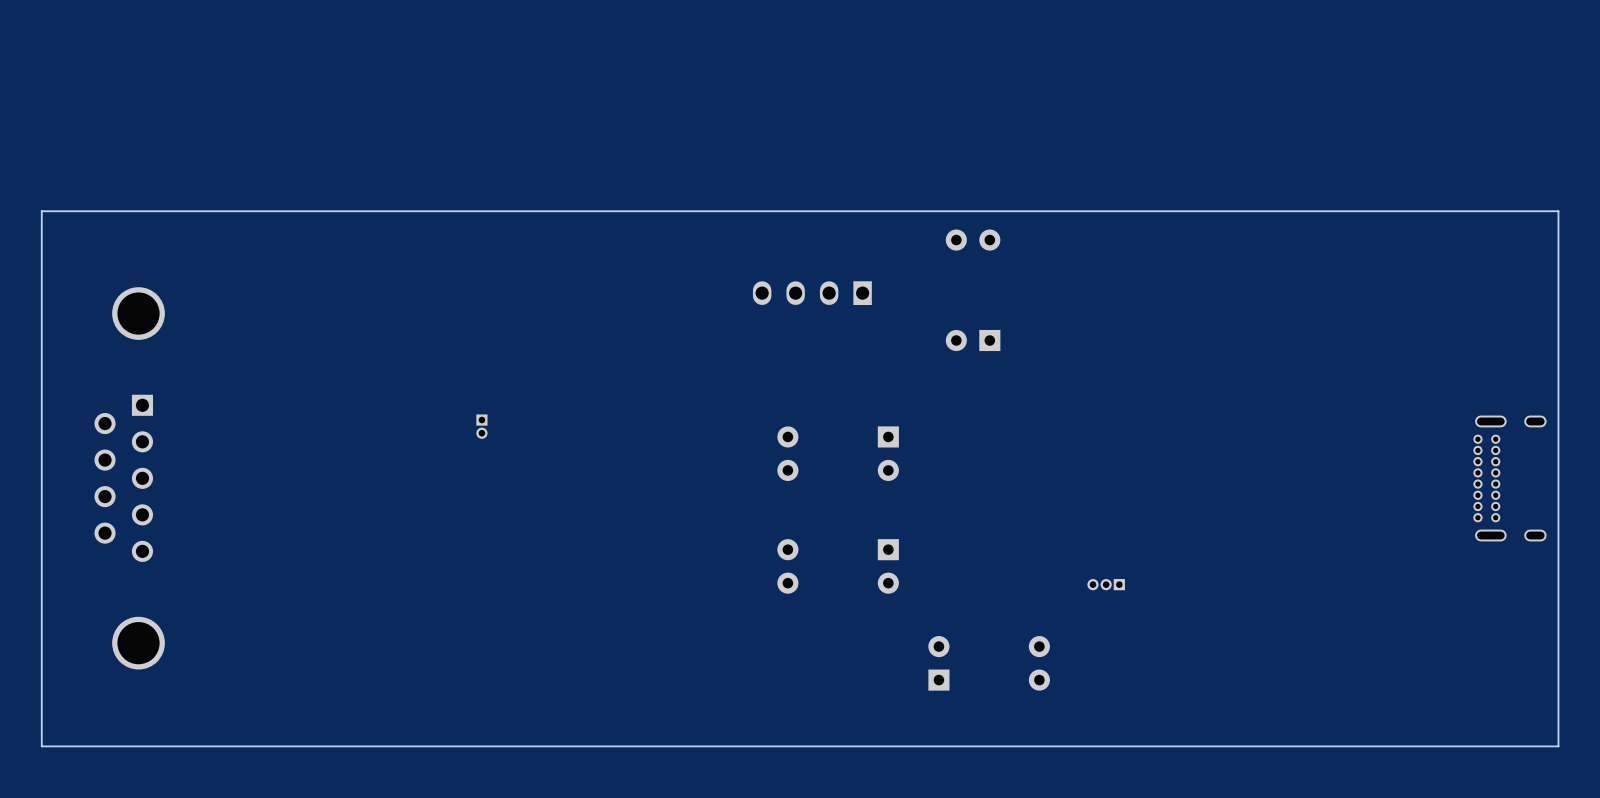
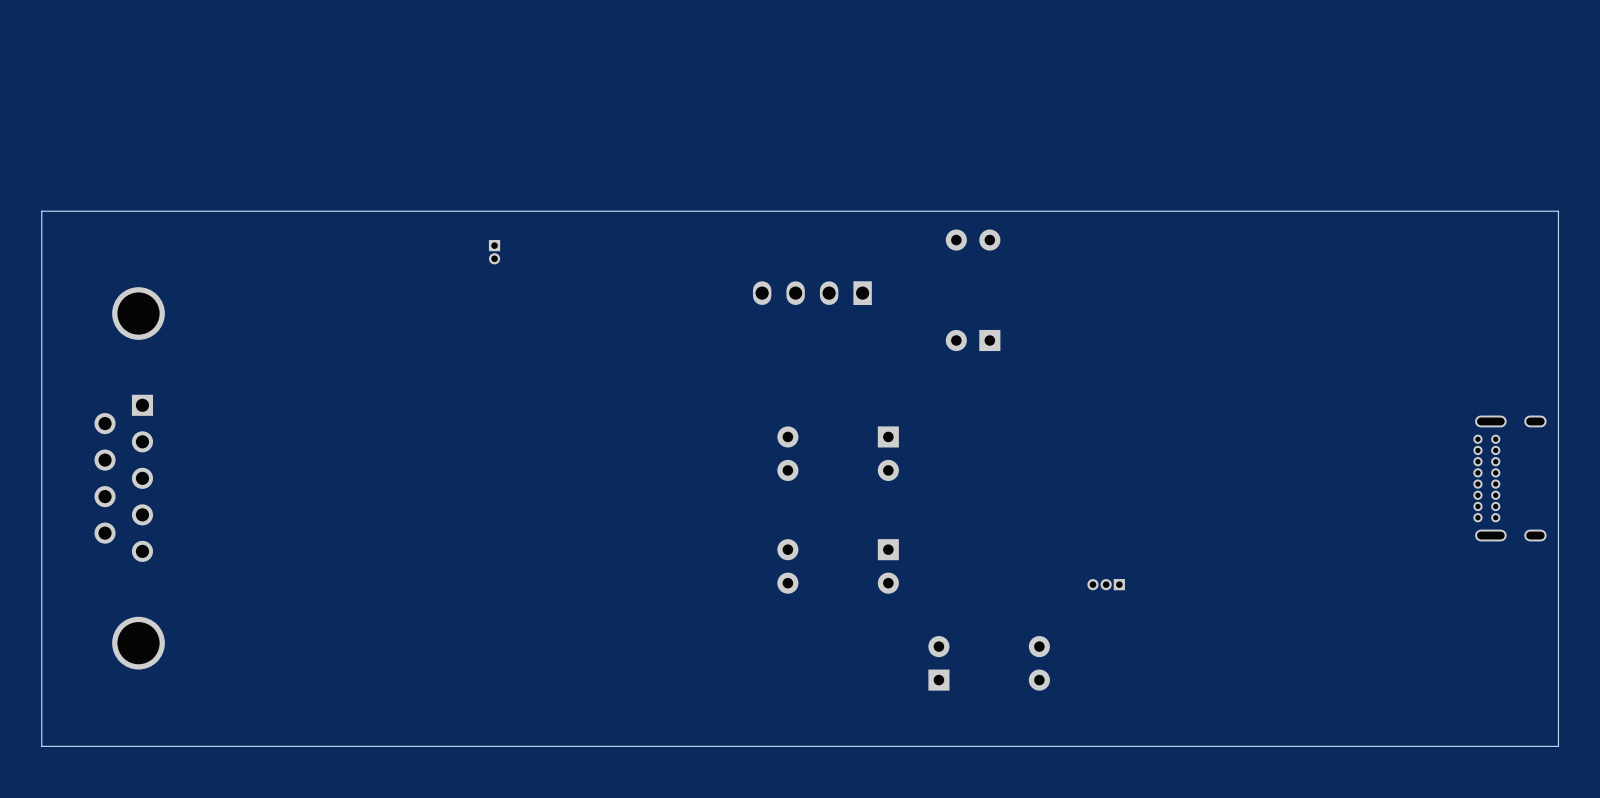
part position: (481, 426) -> (494, 252)

